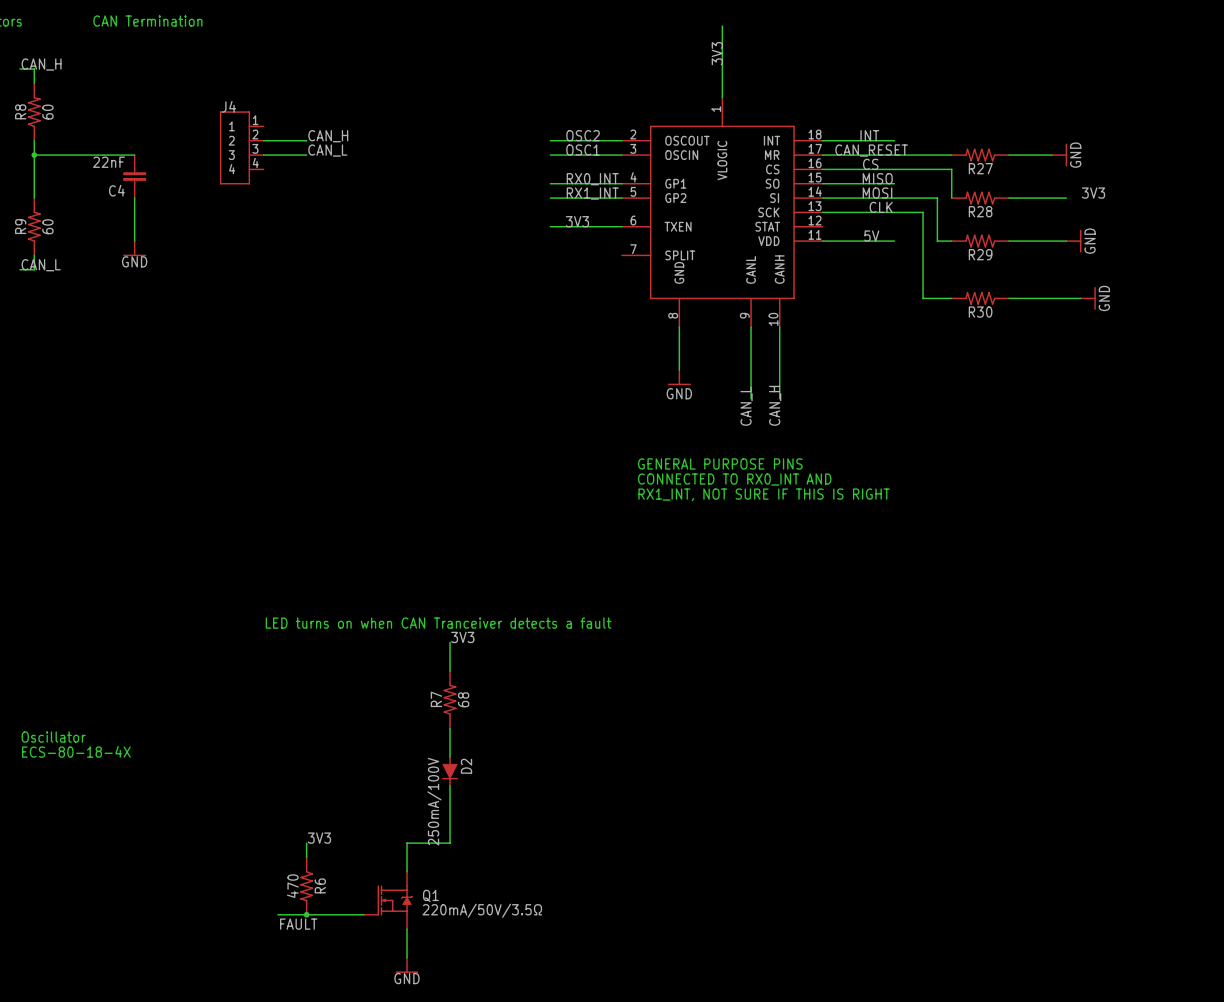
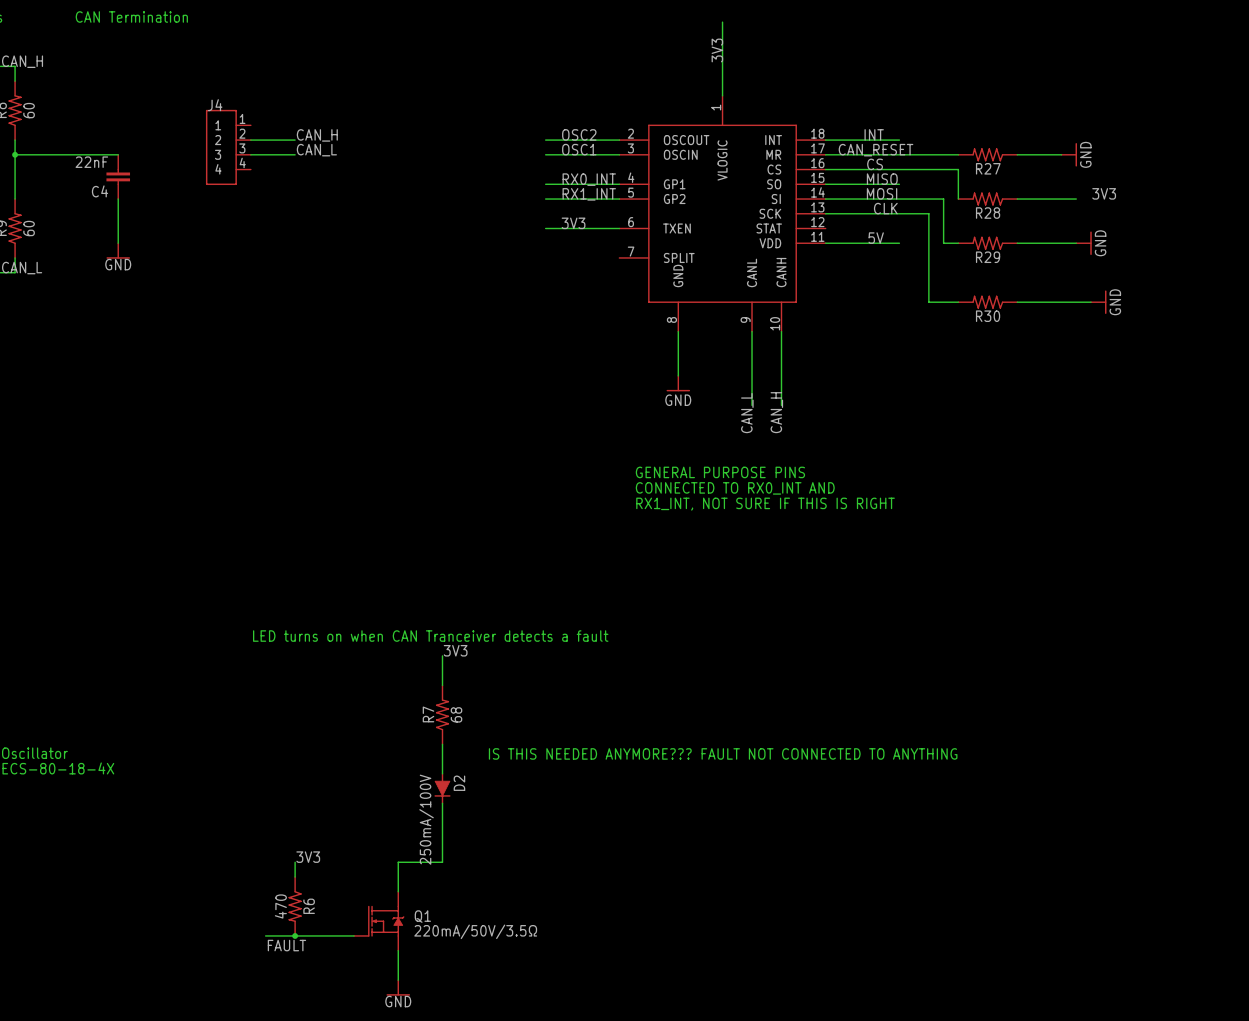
text: none -> IS THIS NEEDED ANYMORE??? FAULT NOT CONNECTED TO ANYTHING (723, 753)

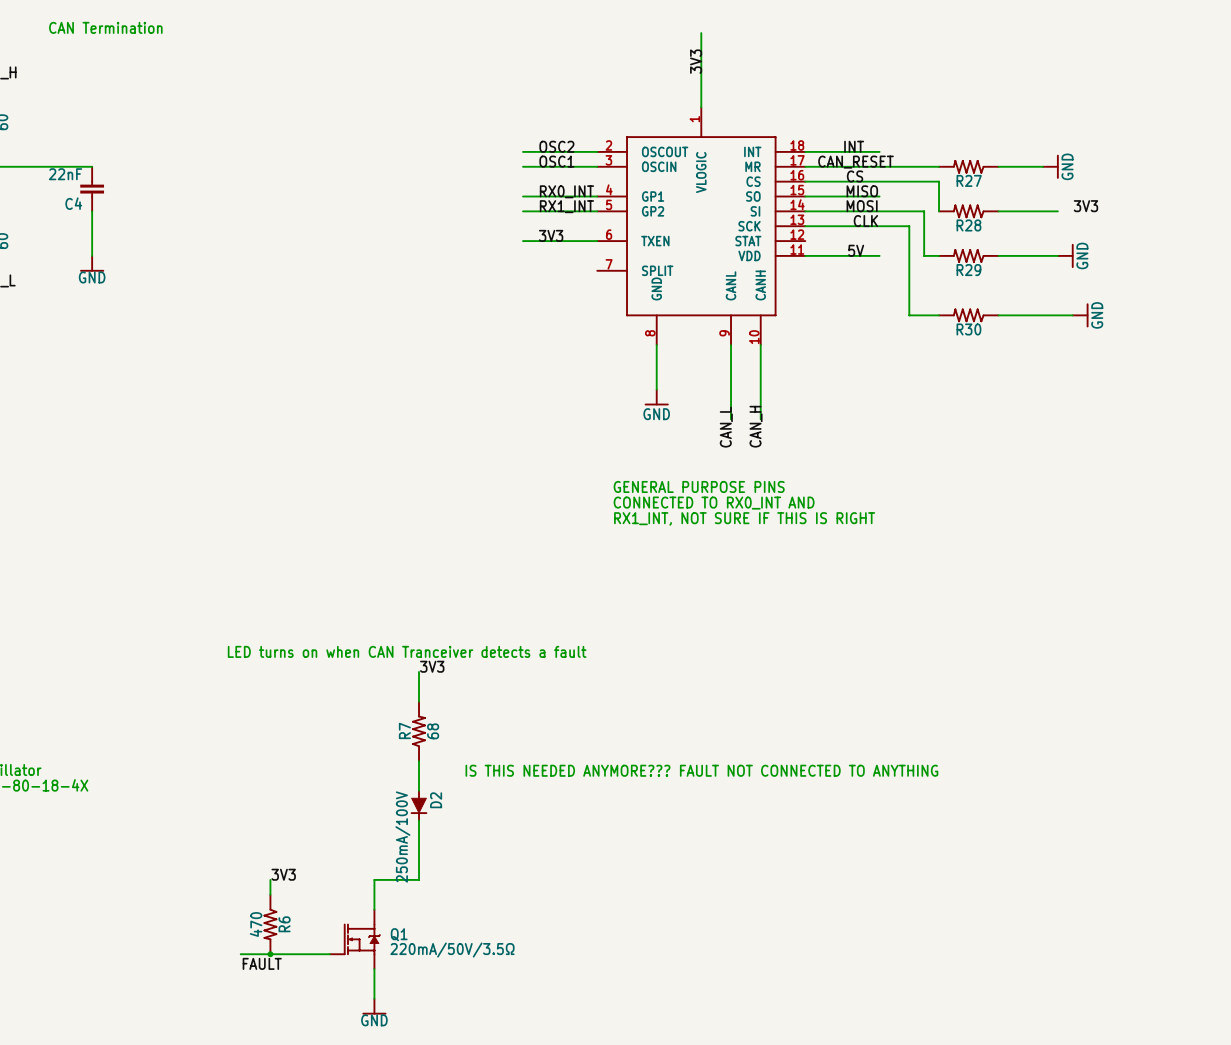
label: CAN_H (317, 135) -> none
wire: (250, 140) (295, 140) -> none
J4: (228, 147) -> none
label: CAN_L (316, 150) -> none
wire: (250, 154) (295, 154) -> none

